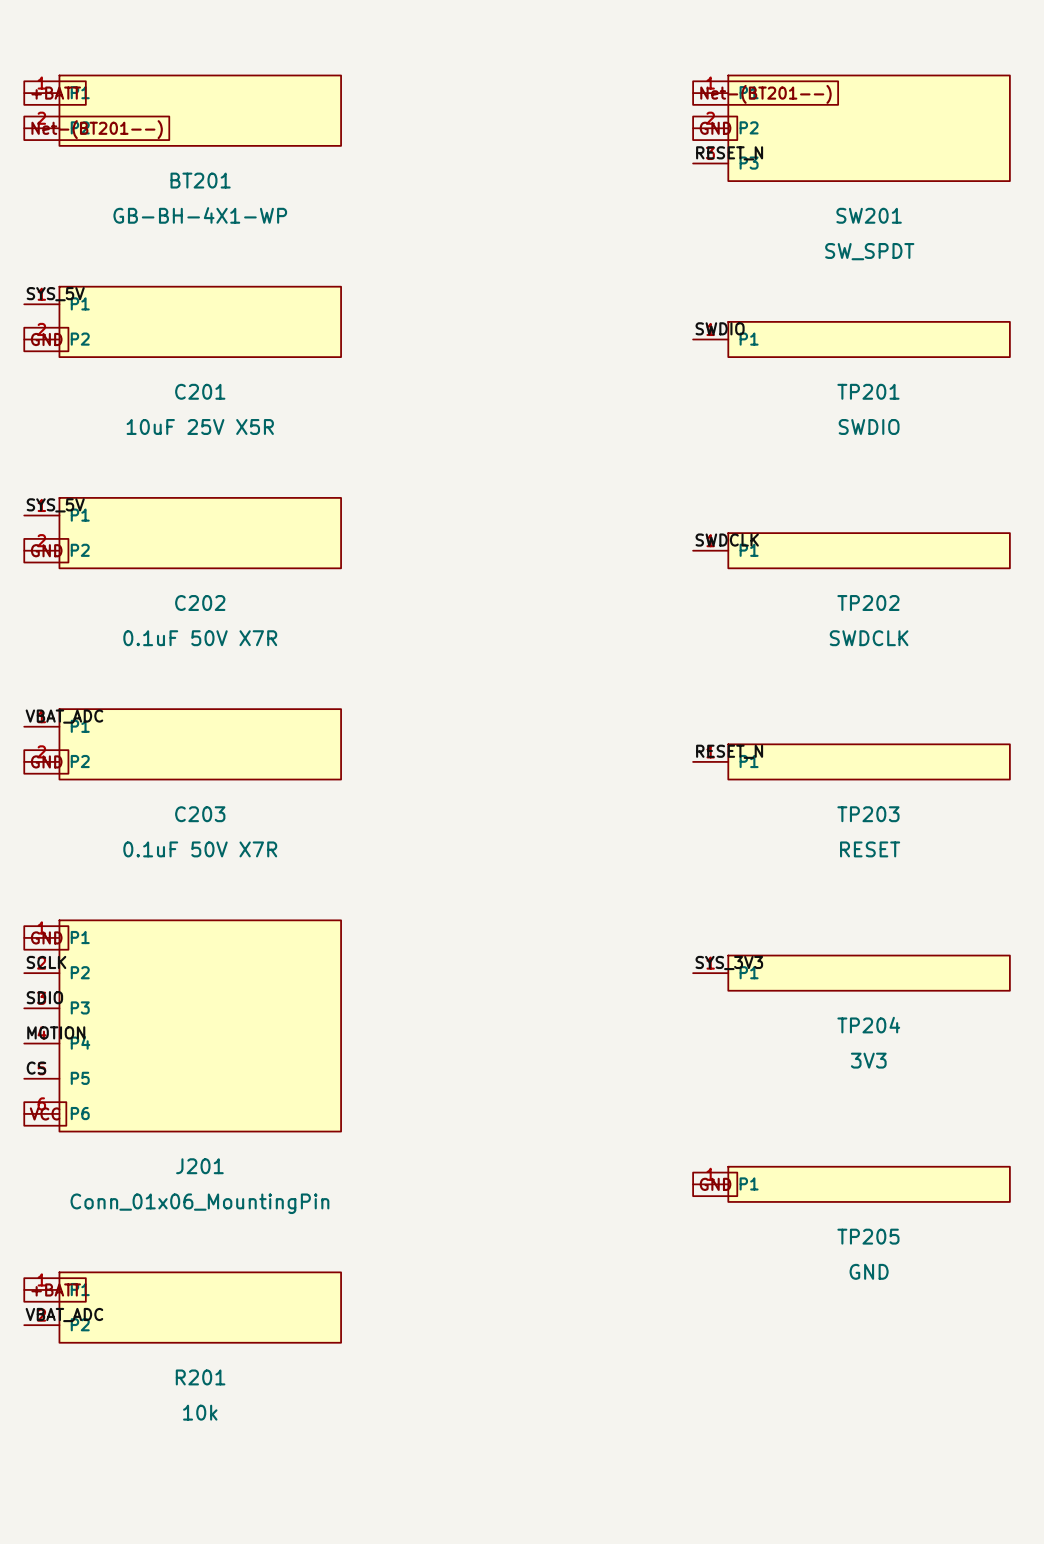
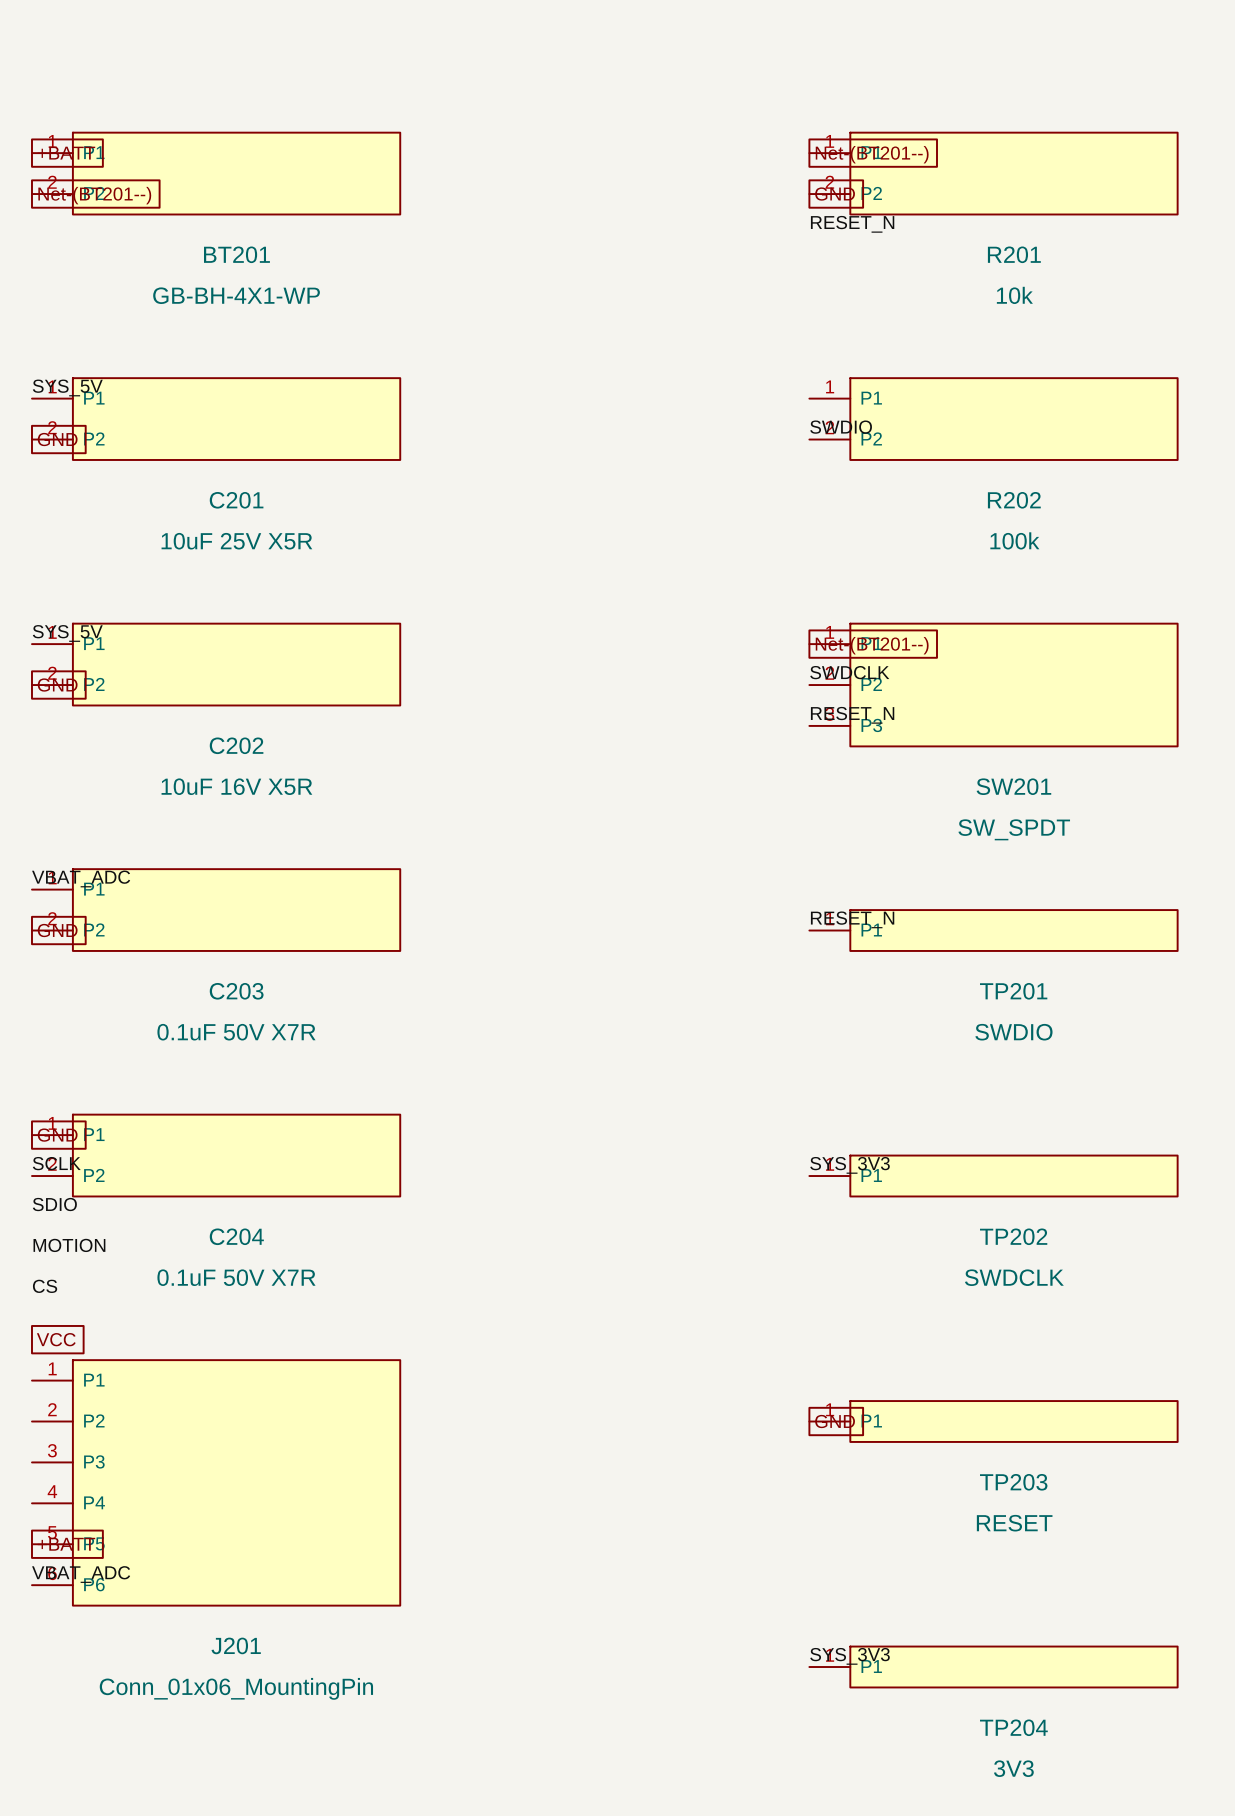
SW201 position: (851, 128) -> (993, 685)
R202: none -> 100k (993, 419)
TP201: SWDIO (851, 339) -> none
global label: none -> Net-(BT201--) (872, 645)
TP202: SWDCLK (851, 550) -> none
label: none -> RESET_N (852, 715)
C202 value: 0.1uF 50V X7R (200, 638) -> 10uF 16V X5R (236, 786)
TP203 name: TP203 (868, 814) -> TP201 (1013, 991)
TP203 value: RESET (870, 849) -> SWDIO (1013, 1032)
C204: none -> 0.1uF 50V X7R (216, 1155)
J201 position: (182, 1025) -> (216, 1482)
TP204 name: TP204 (868, 1025) -> TP202 (1013, 1236)
TP204 value: 3V3 (868, 1060) -> SWDCLK (1014, 1277)
TP205 name: TP205 (868, 1236) -> TP203 (1013, 1482)
TP205 value: GND (869, 1271) -> RESET (1014, 1523)
R201 position: (182, 1307) -> (993, 173)
label: none -> SYS_3V3 (850, 1656)
TP204: none -> 3V3 (993, 1667)

